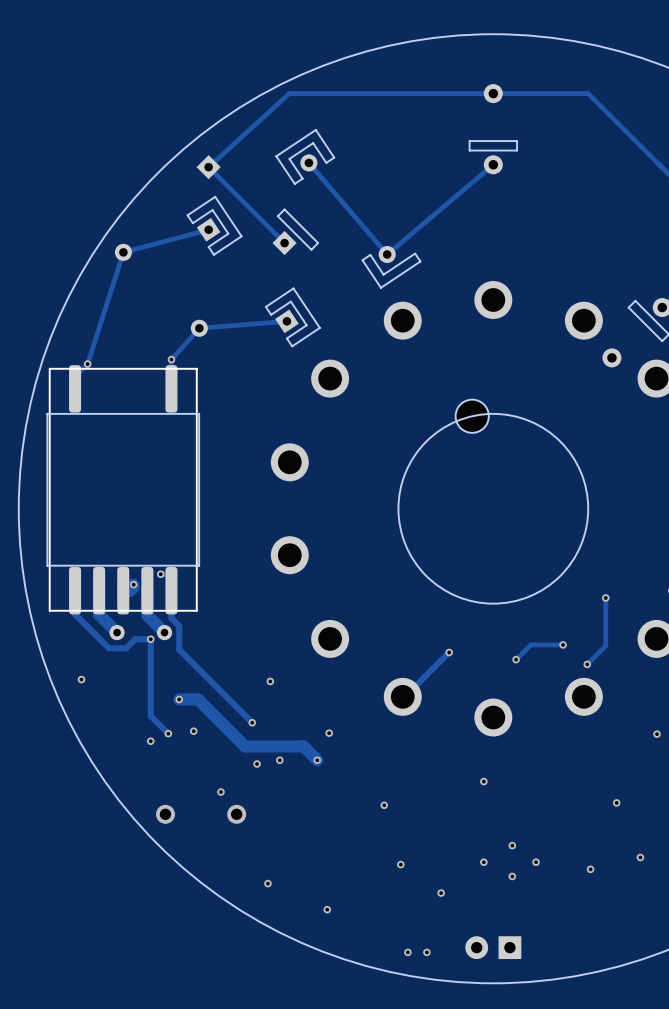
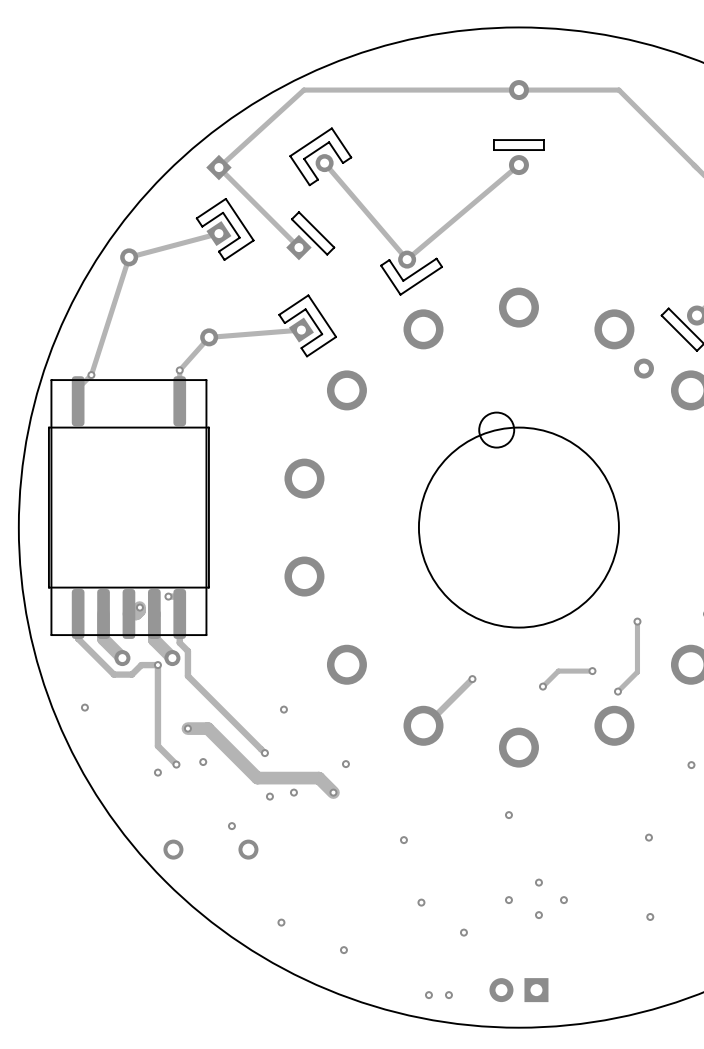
via: (640, 857) -> none
via: (590, 869) -> none
via: none -> (650, 916)

